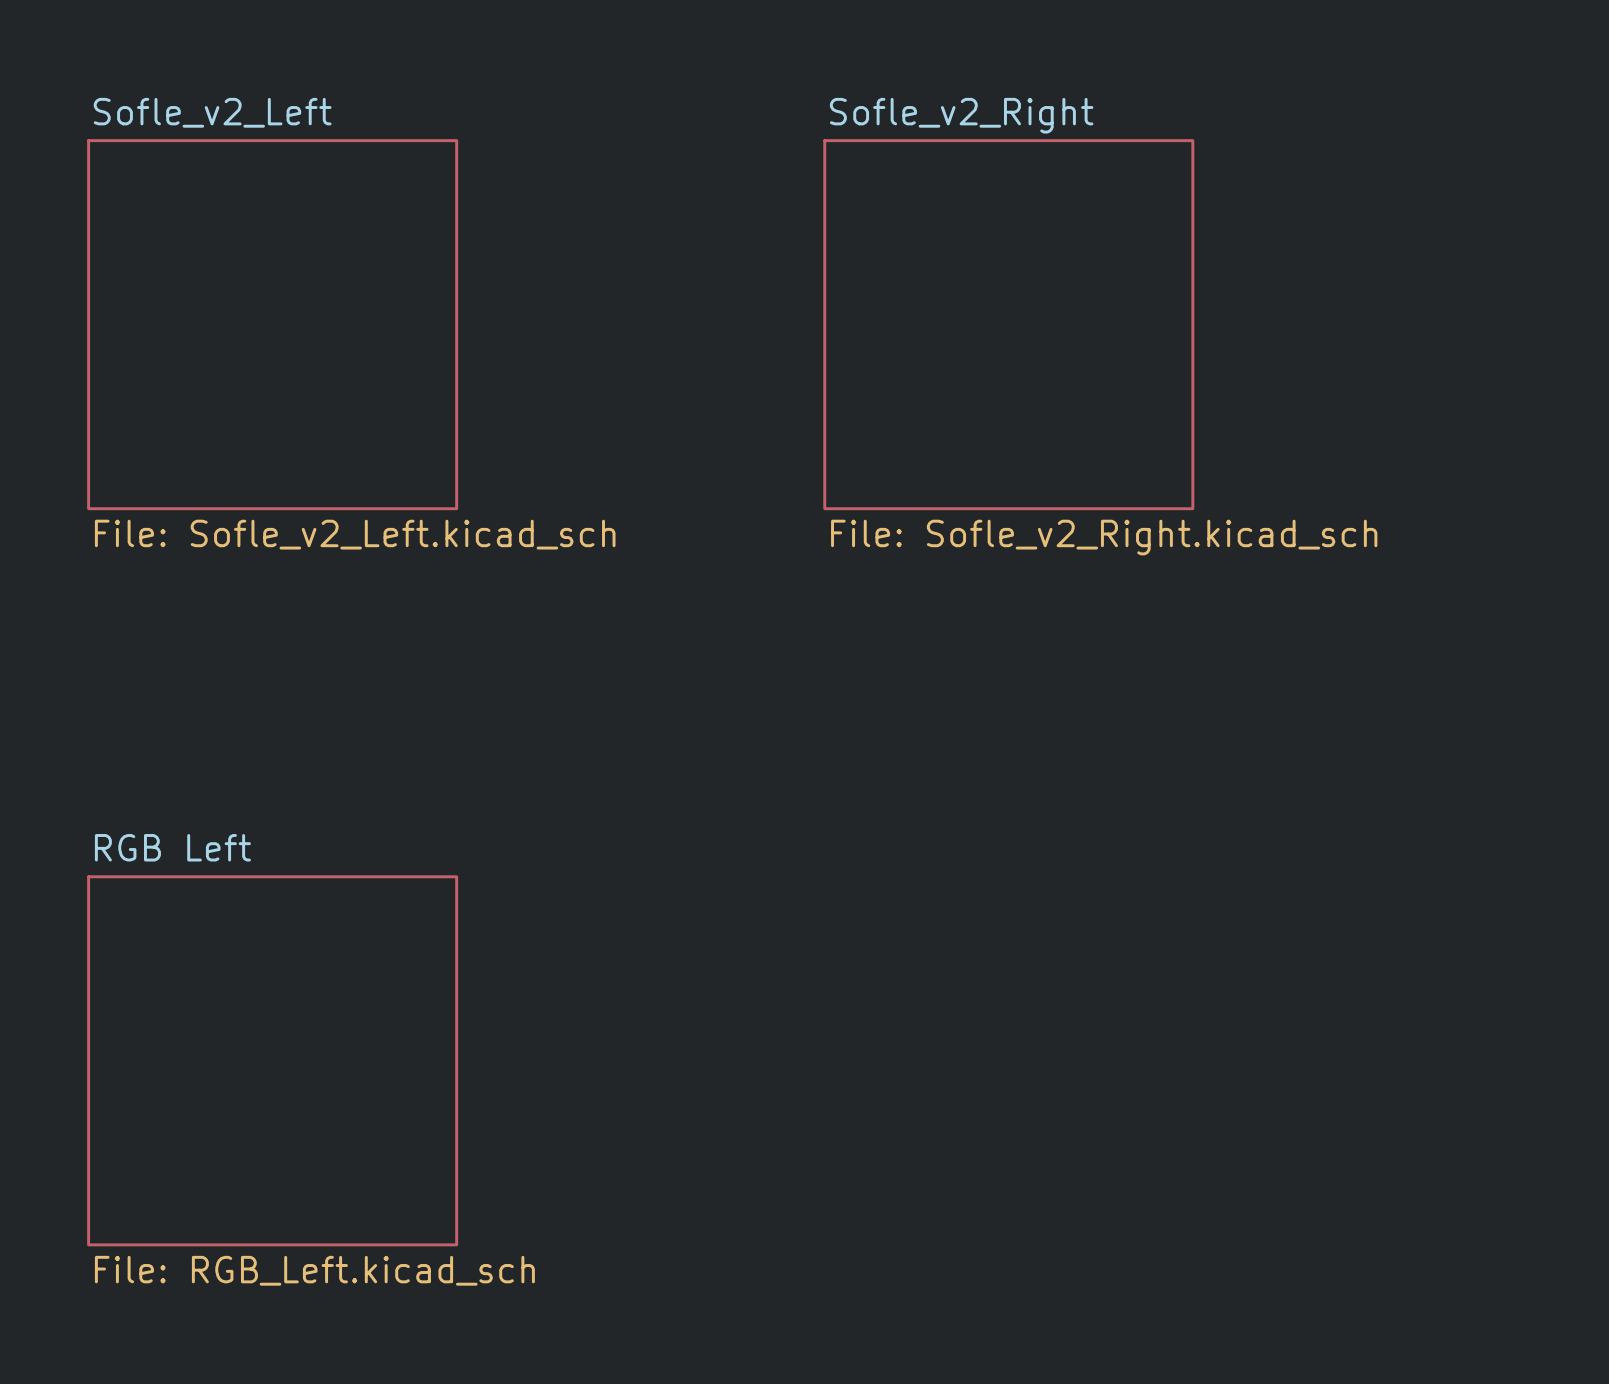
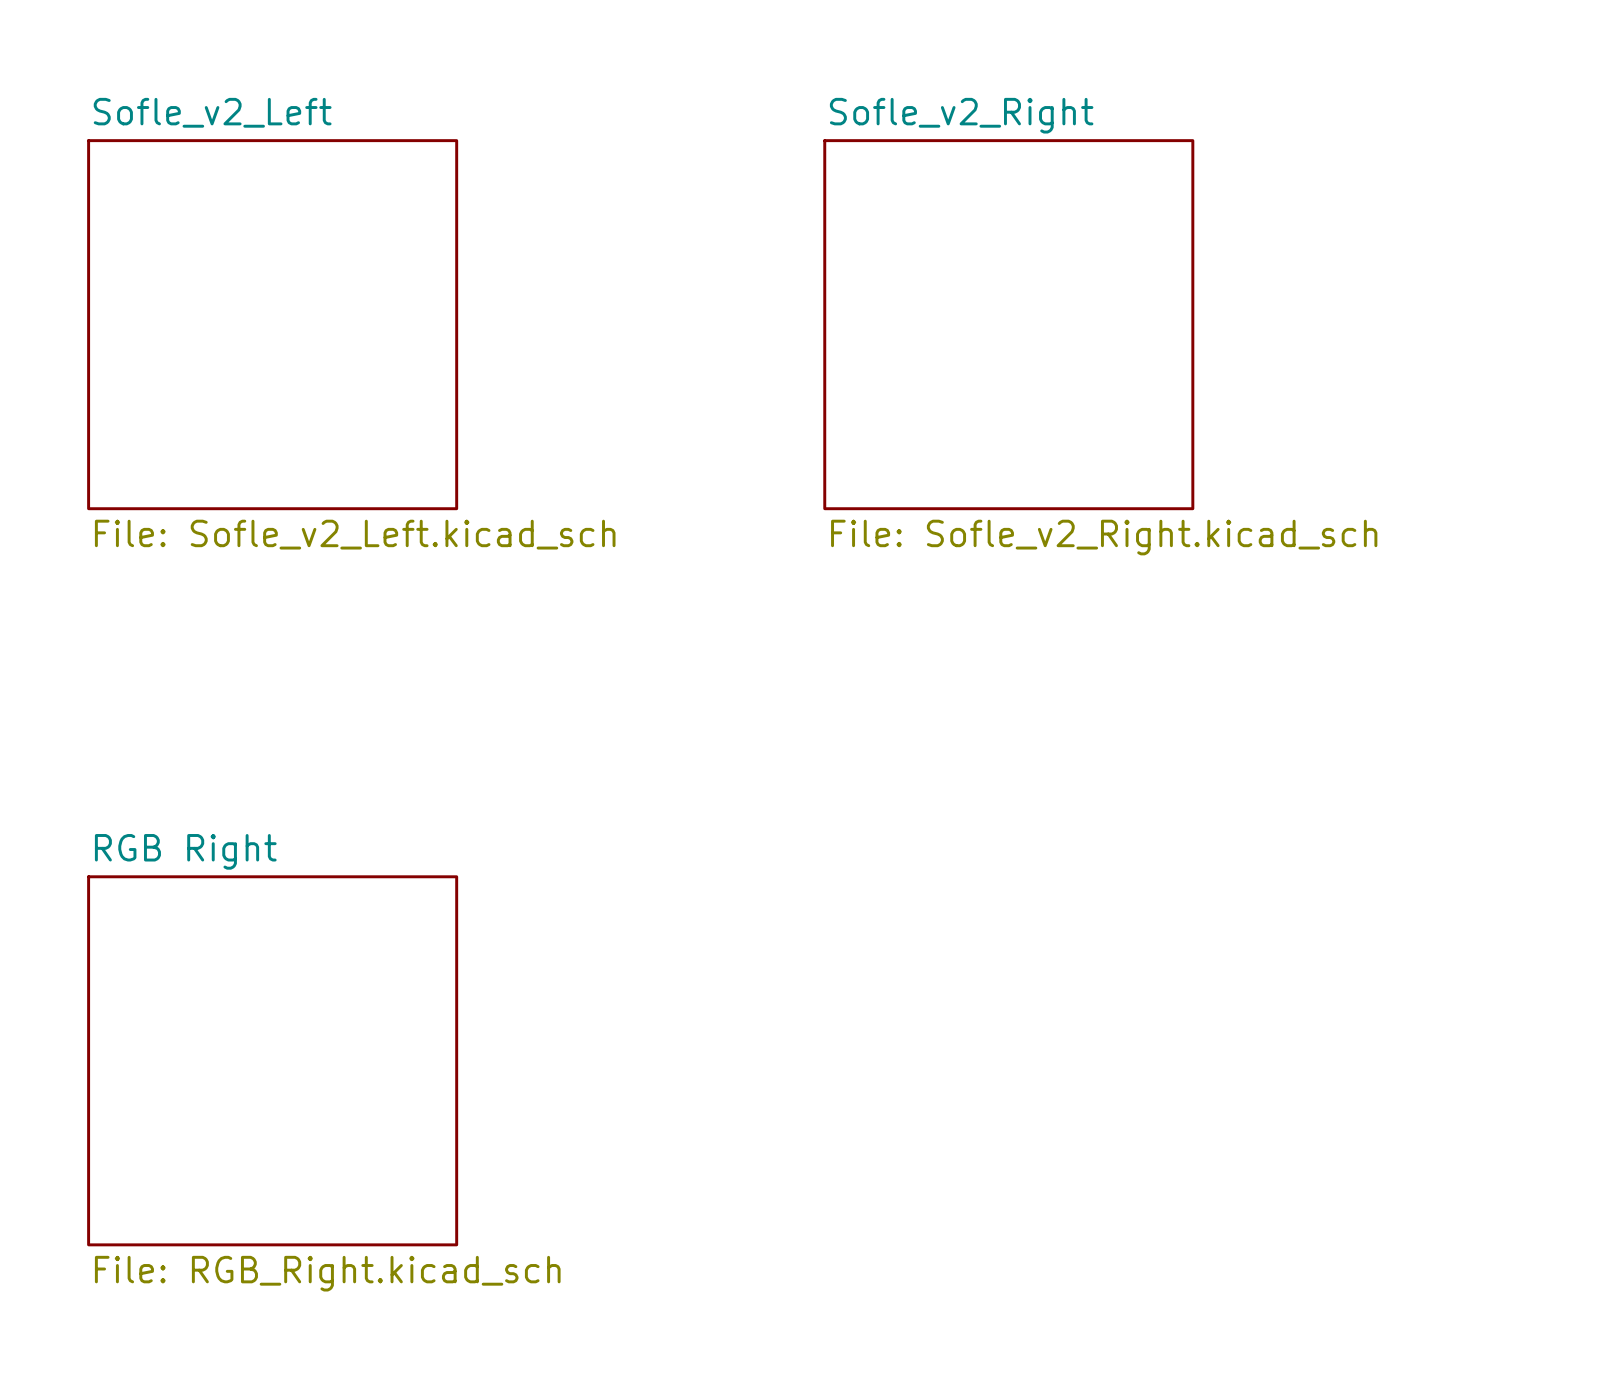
sheet RGB Left name: RGB Left (172, 847) -> RGB Right (185, 851)
sheet RGB Left value: File: RGB_Left.kicad_sch (314, 1270) -> File: RGB_Right.kicad_sch (327, 1273)

